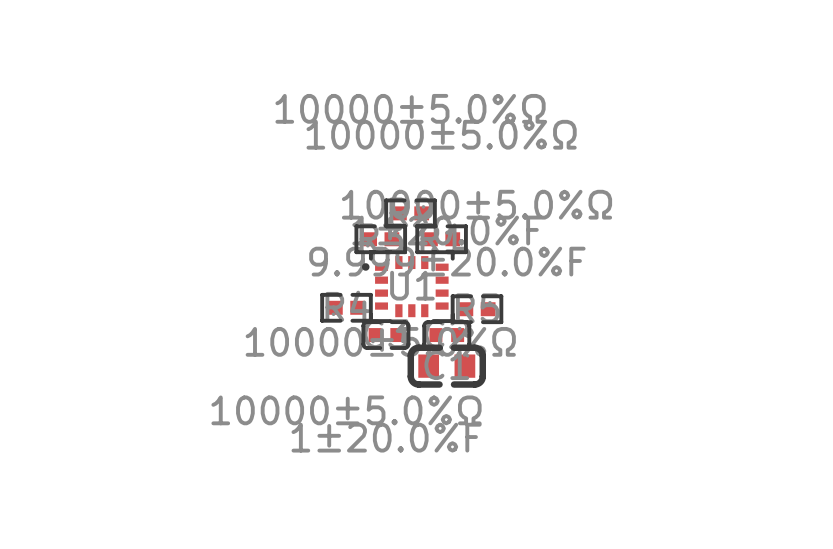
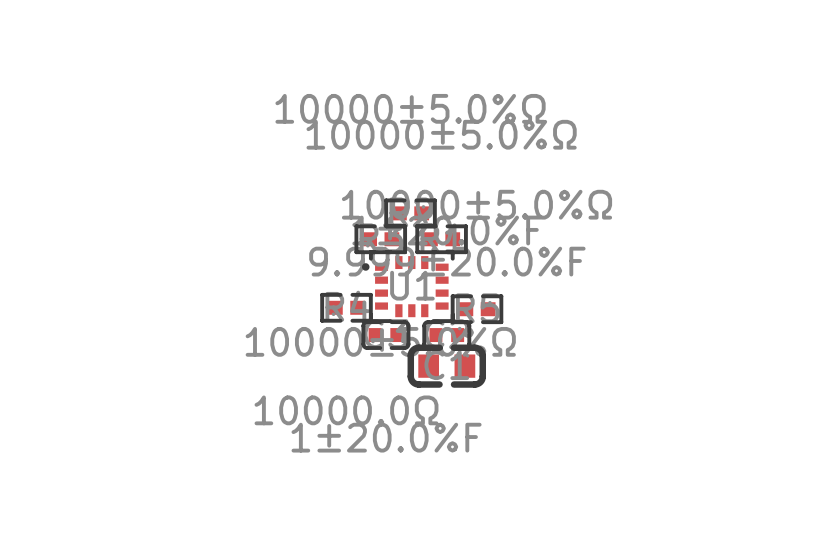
part value: 10000±5.0%Ω (346, 410) -> 10000.0Ω (346, 410)

